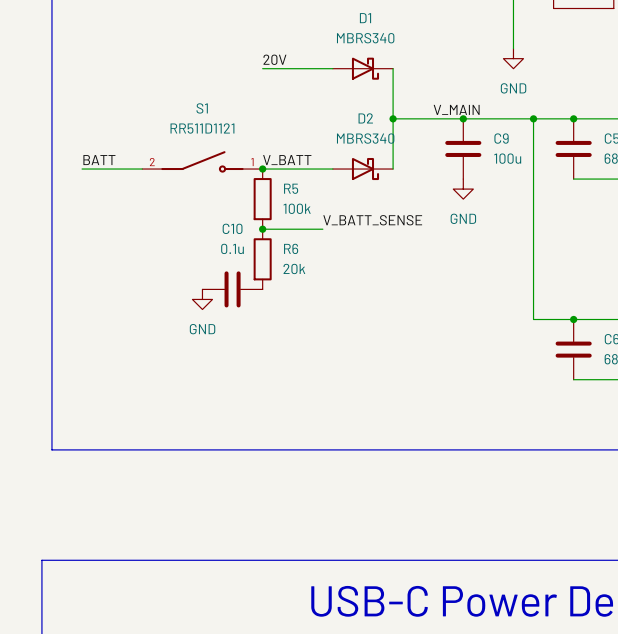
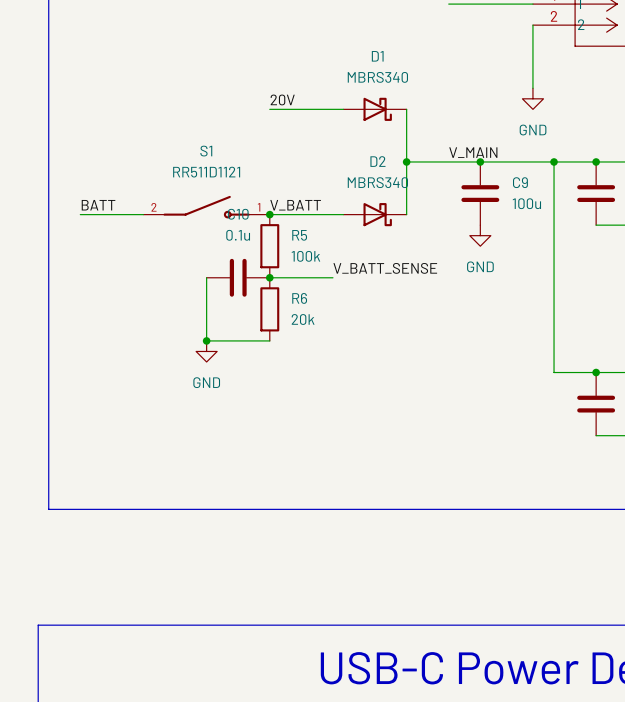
wire: none -> (206, 277) (206, 340) (269, 340)
junction: none -> (206, 340)
C10 position: (232, 289) -> (238, 277)

